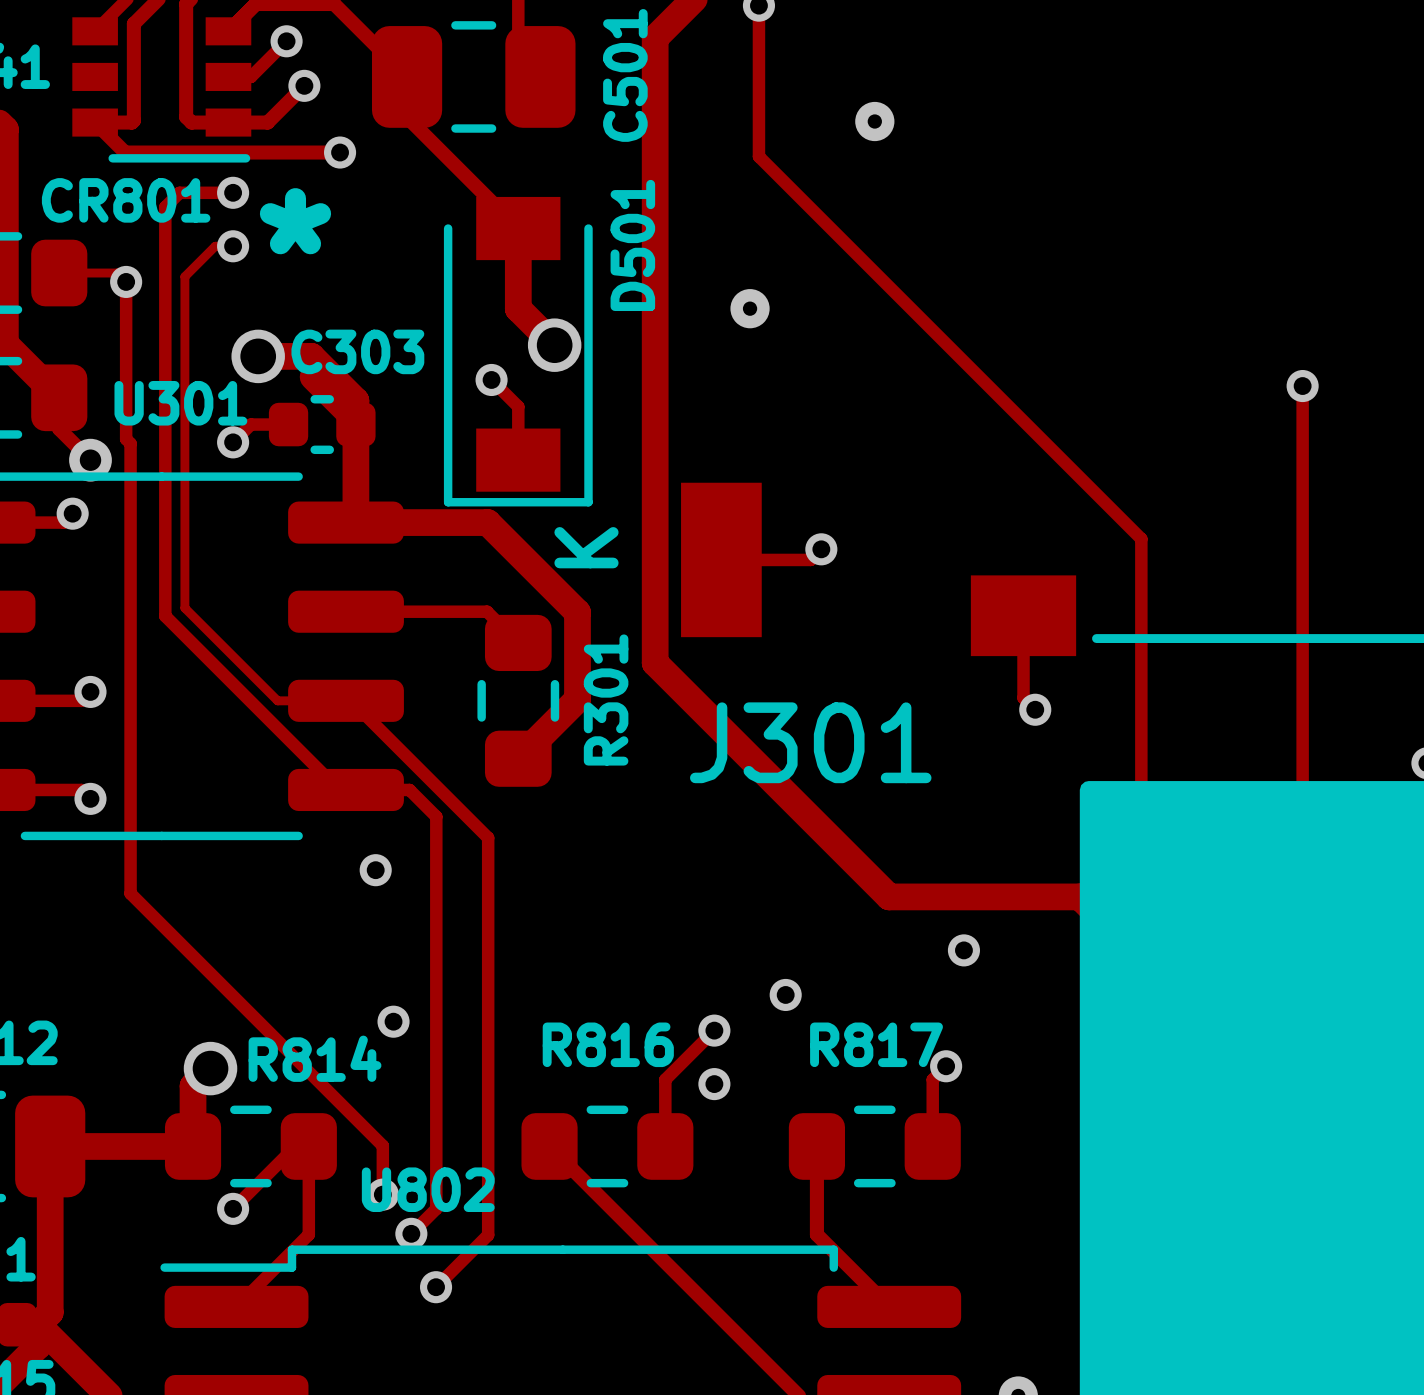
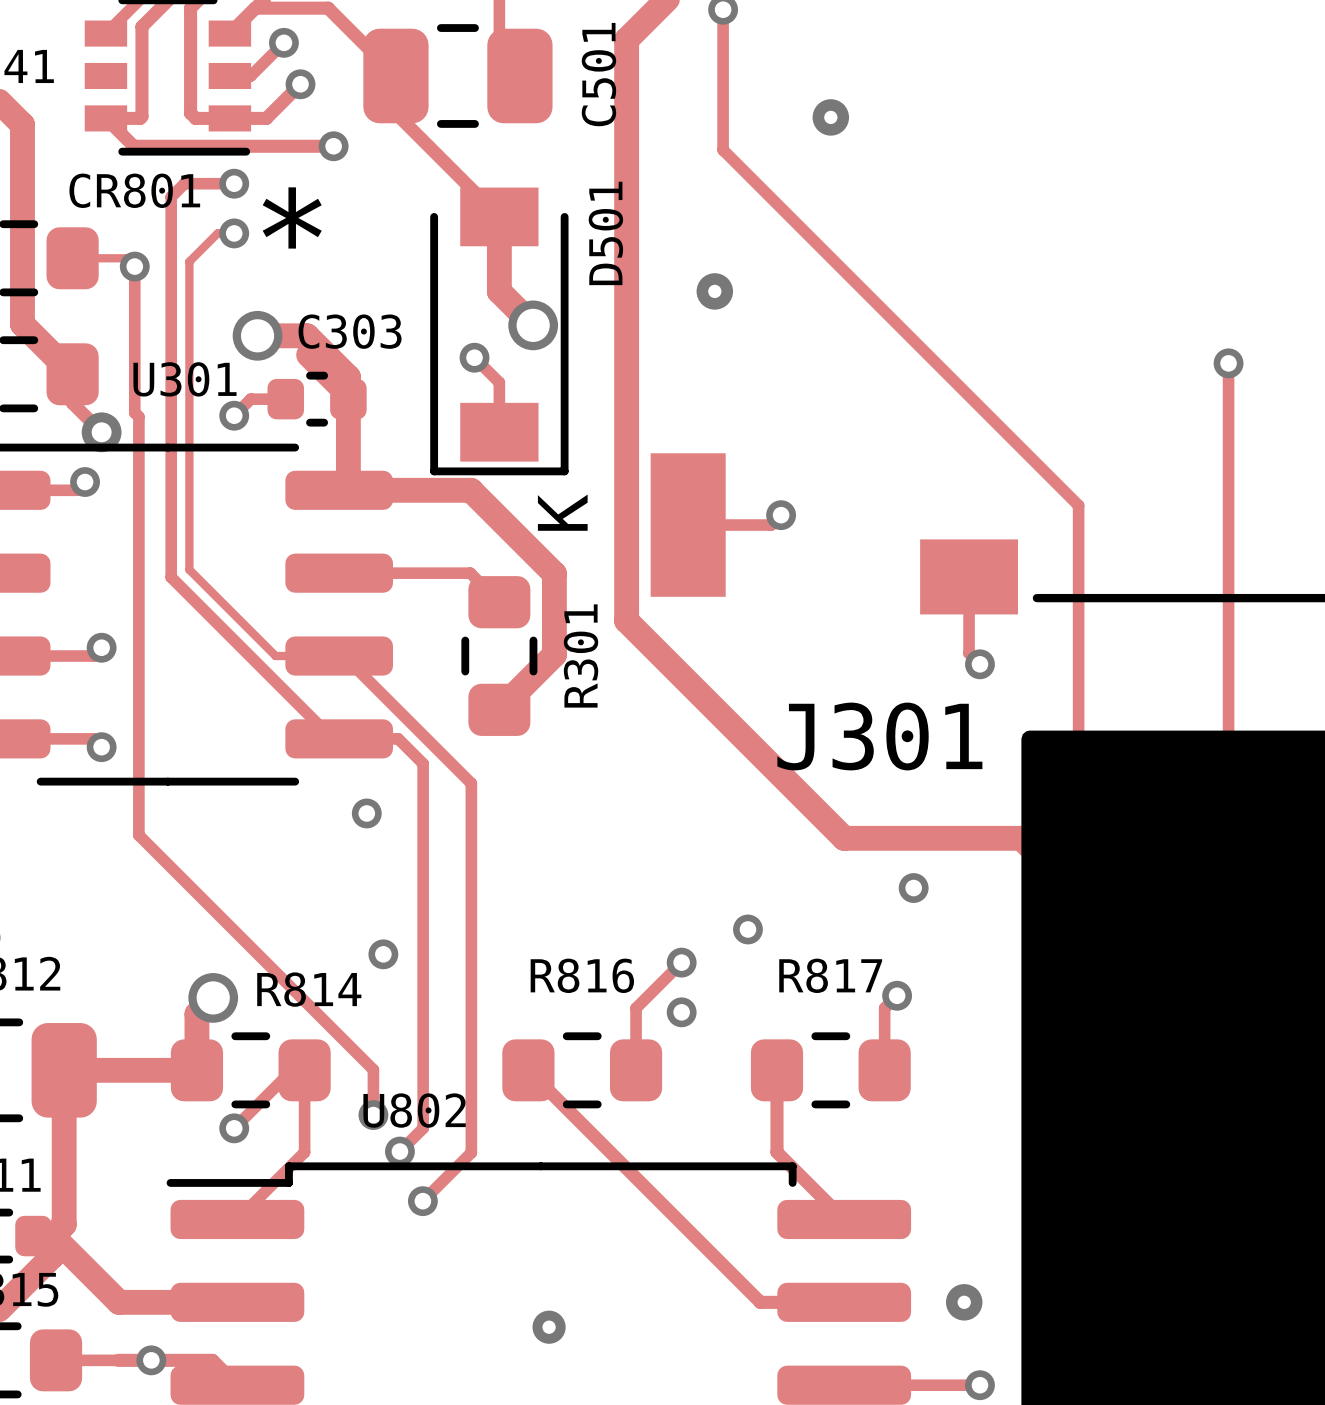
J301 name position: J301 (810, 742) -> J301 (879, 736)

